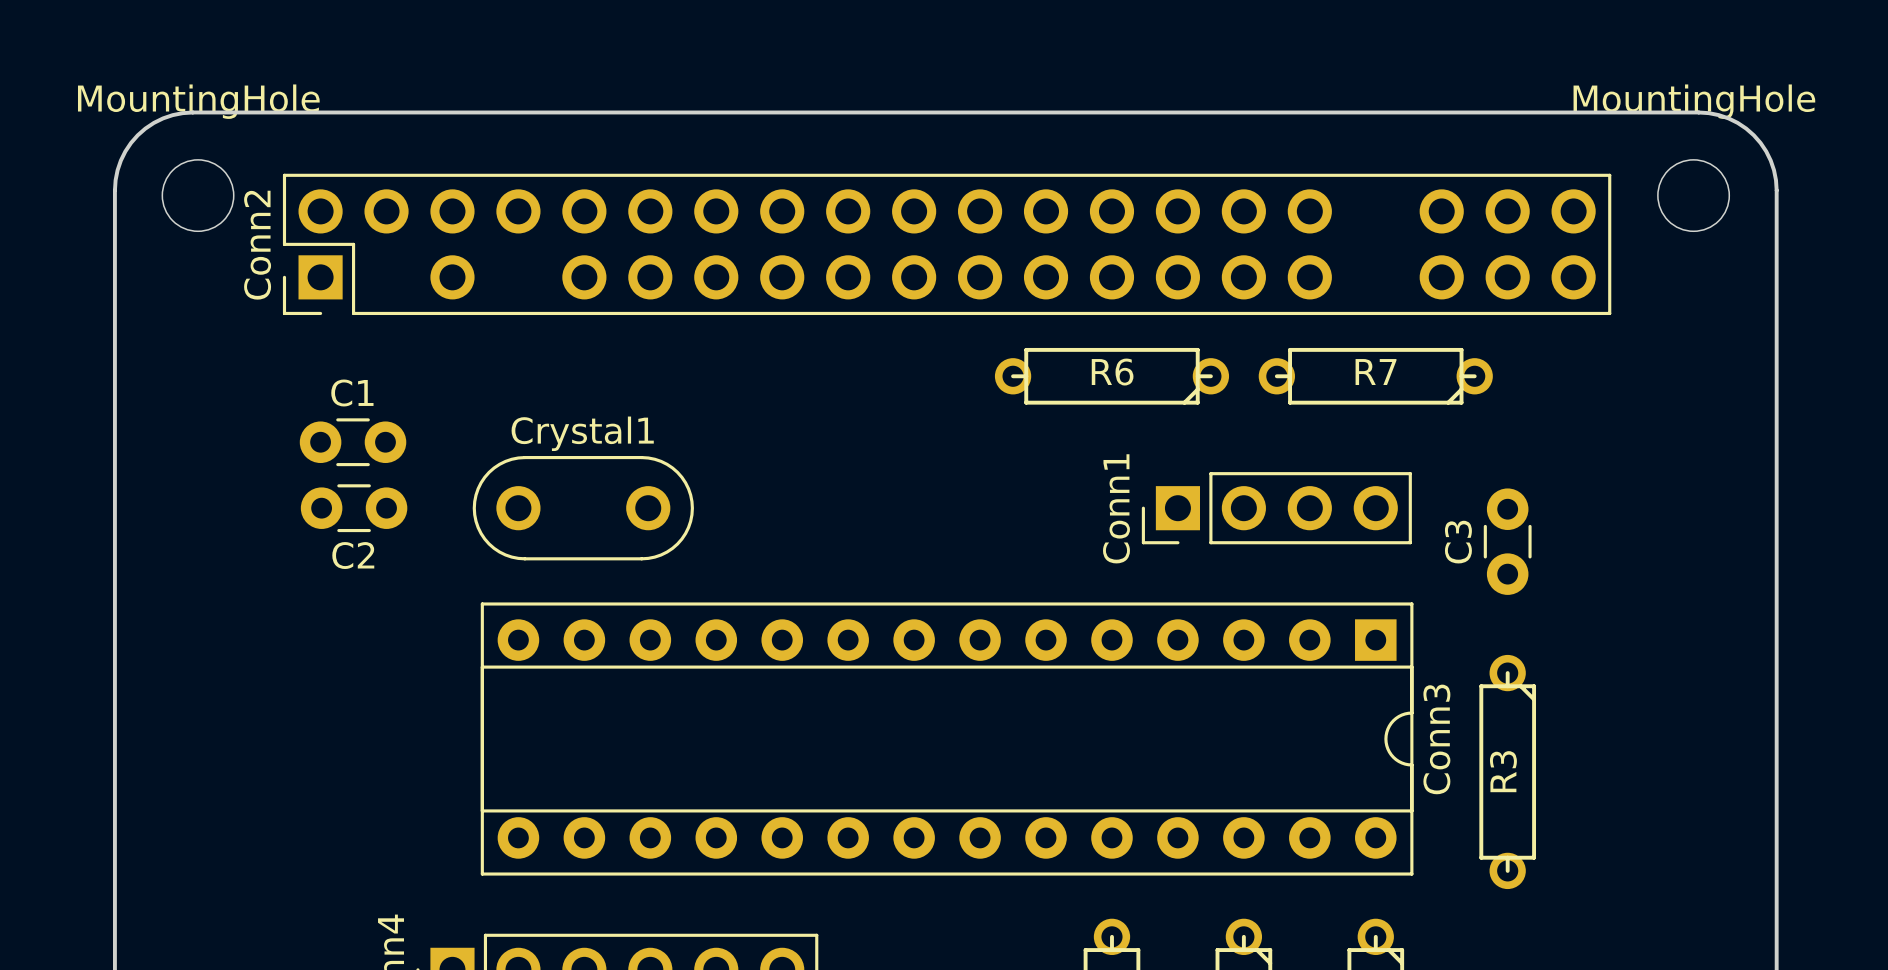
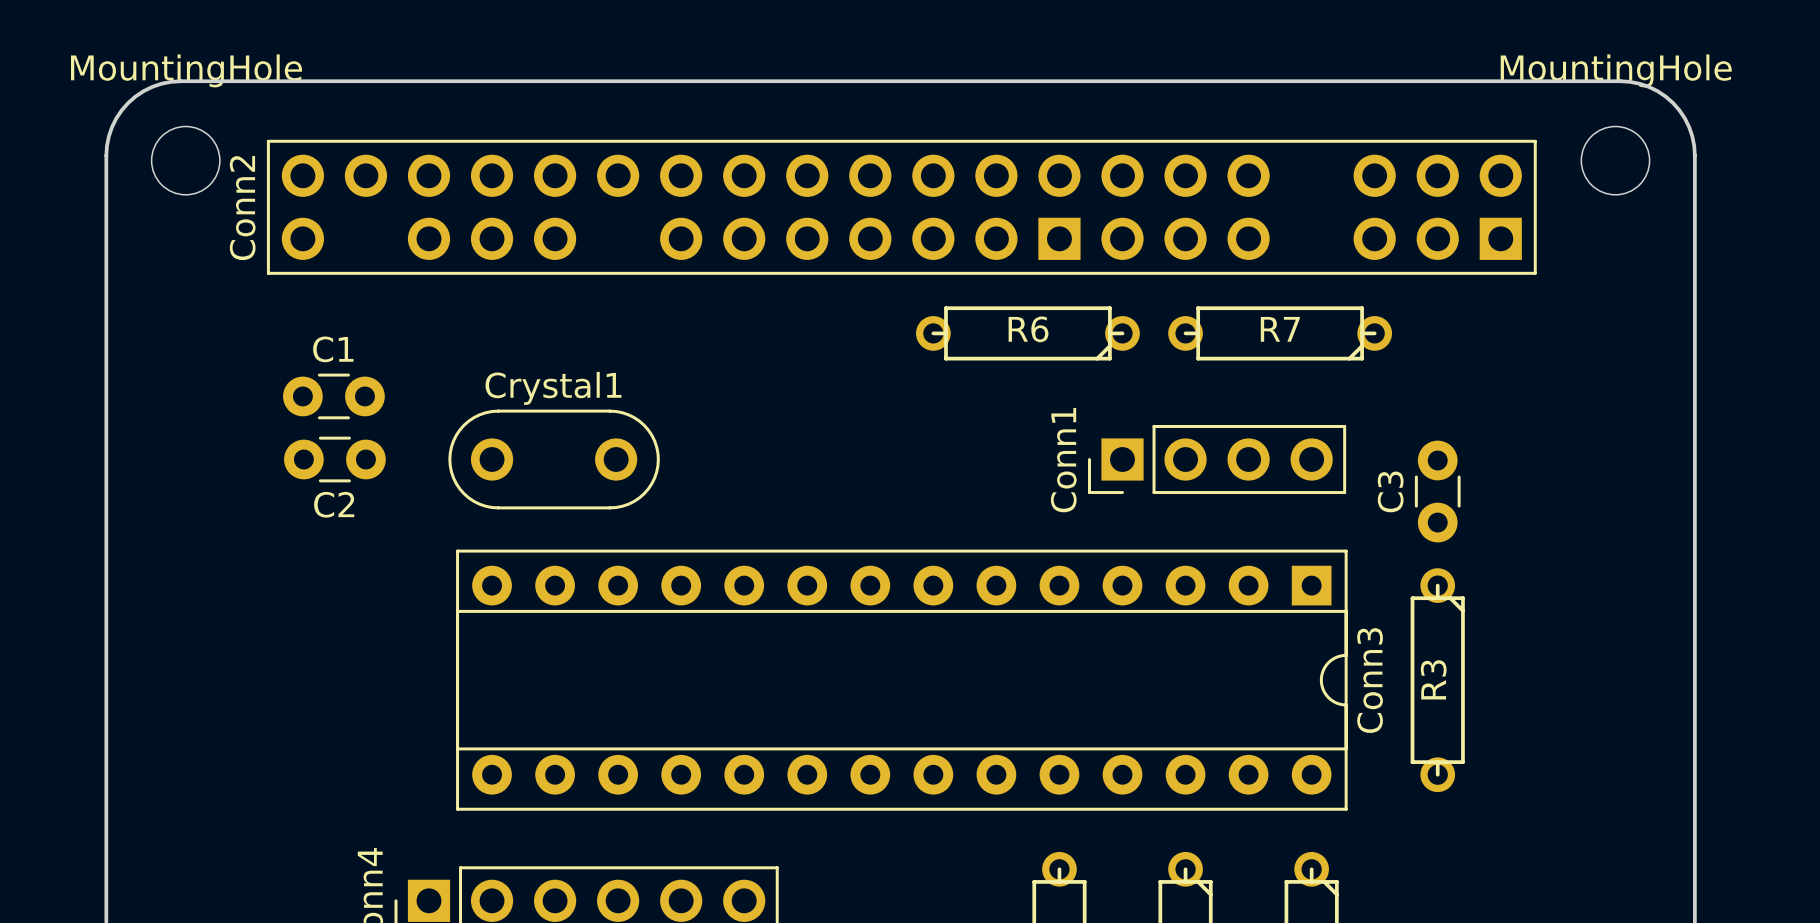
Conn2 footprint: [282, 173, 1612, 316] -> [266, 139, 1537, 275]
R6 position: (1111, 376) -> (1027, 333)
R7 position: (1375, 376) -> (1280, 333)
R3 position: (1507, 771) -> (1437, 680)

